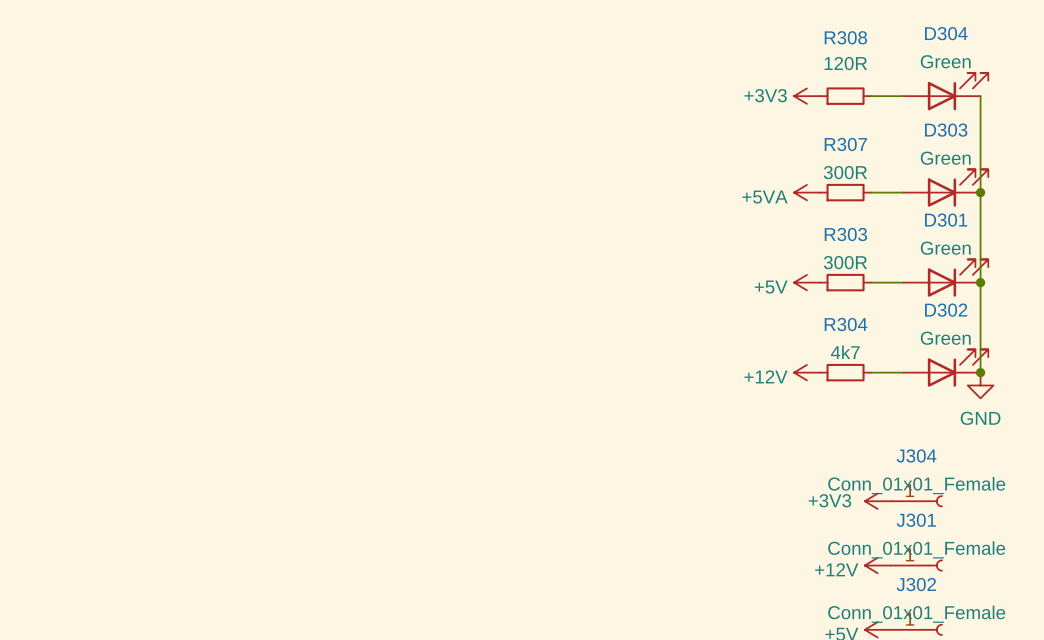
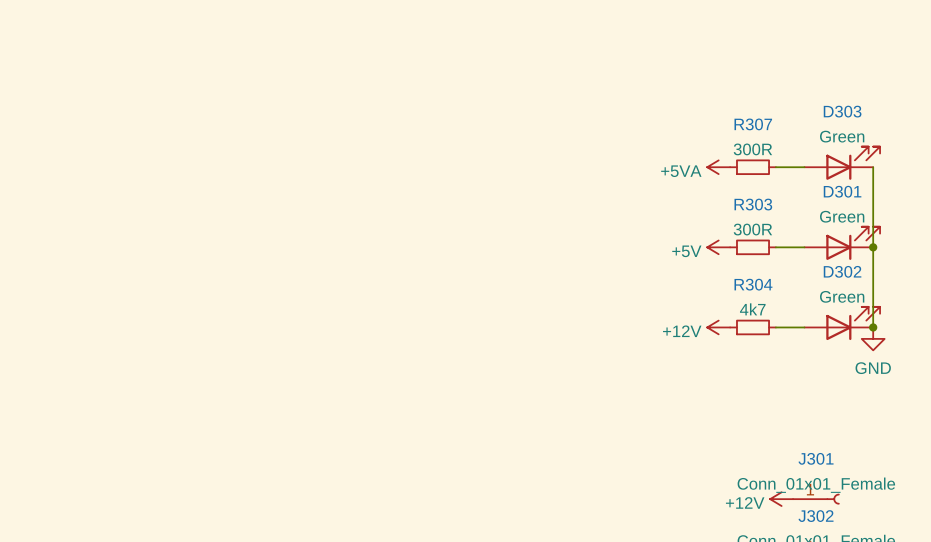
D304: Green (945, 91) -> none
power symbol: +3V3 (806, 96) -> none
R308: 120R (845, 96) -> none
wire: (871, 96) (903, 96) -> none
wire: (980, 96) (980, 192) -> none
junction: (980, 192) -> none
power symbol: +3V3 (877, 501) -> none
J304: Conn_01x01_Female (916, 501) -> none

